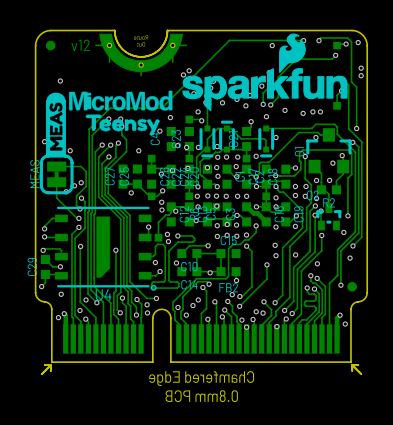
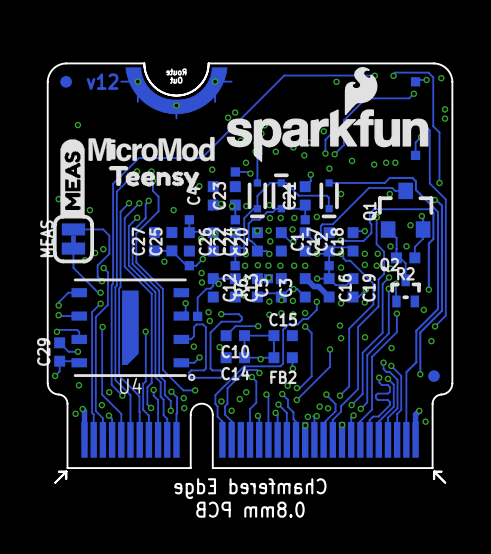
via: (256, 311) -> none
via: none -> (319, 406)
via: (263, 313) -> none
via: none -> (328, 408)
via: (253, 319) -> none
via: none -> (316, 416)
via: (241, 320) -> none
via: none -> (307, 416)

